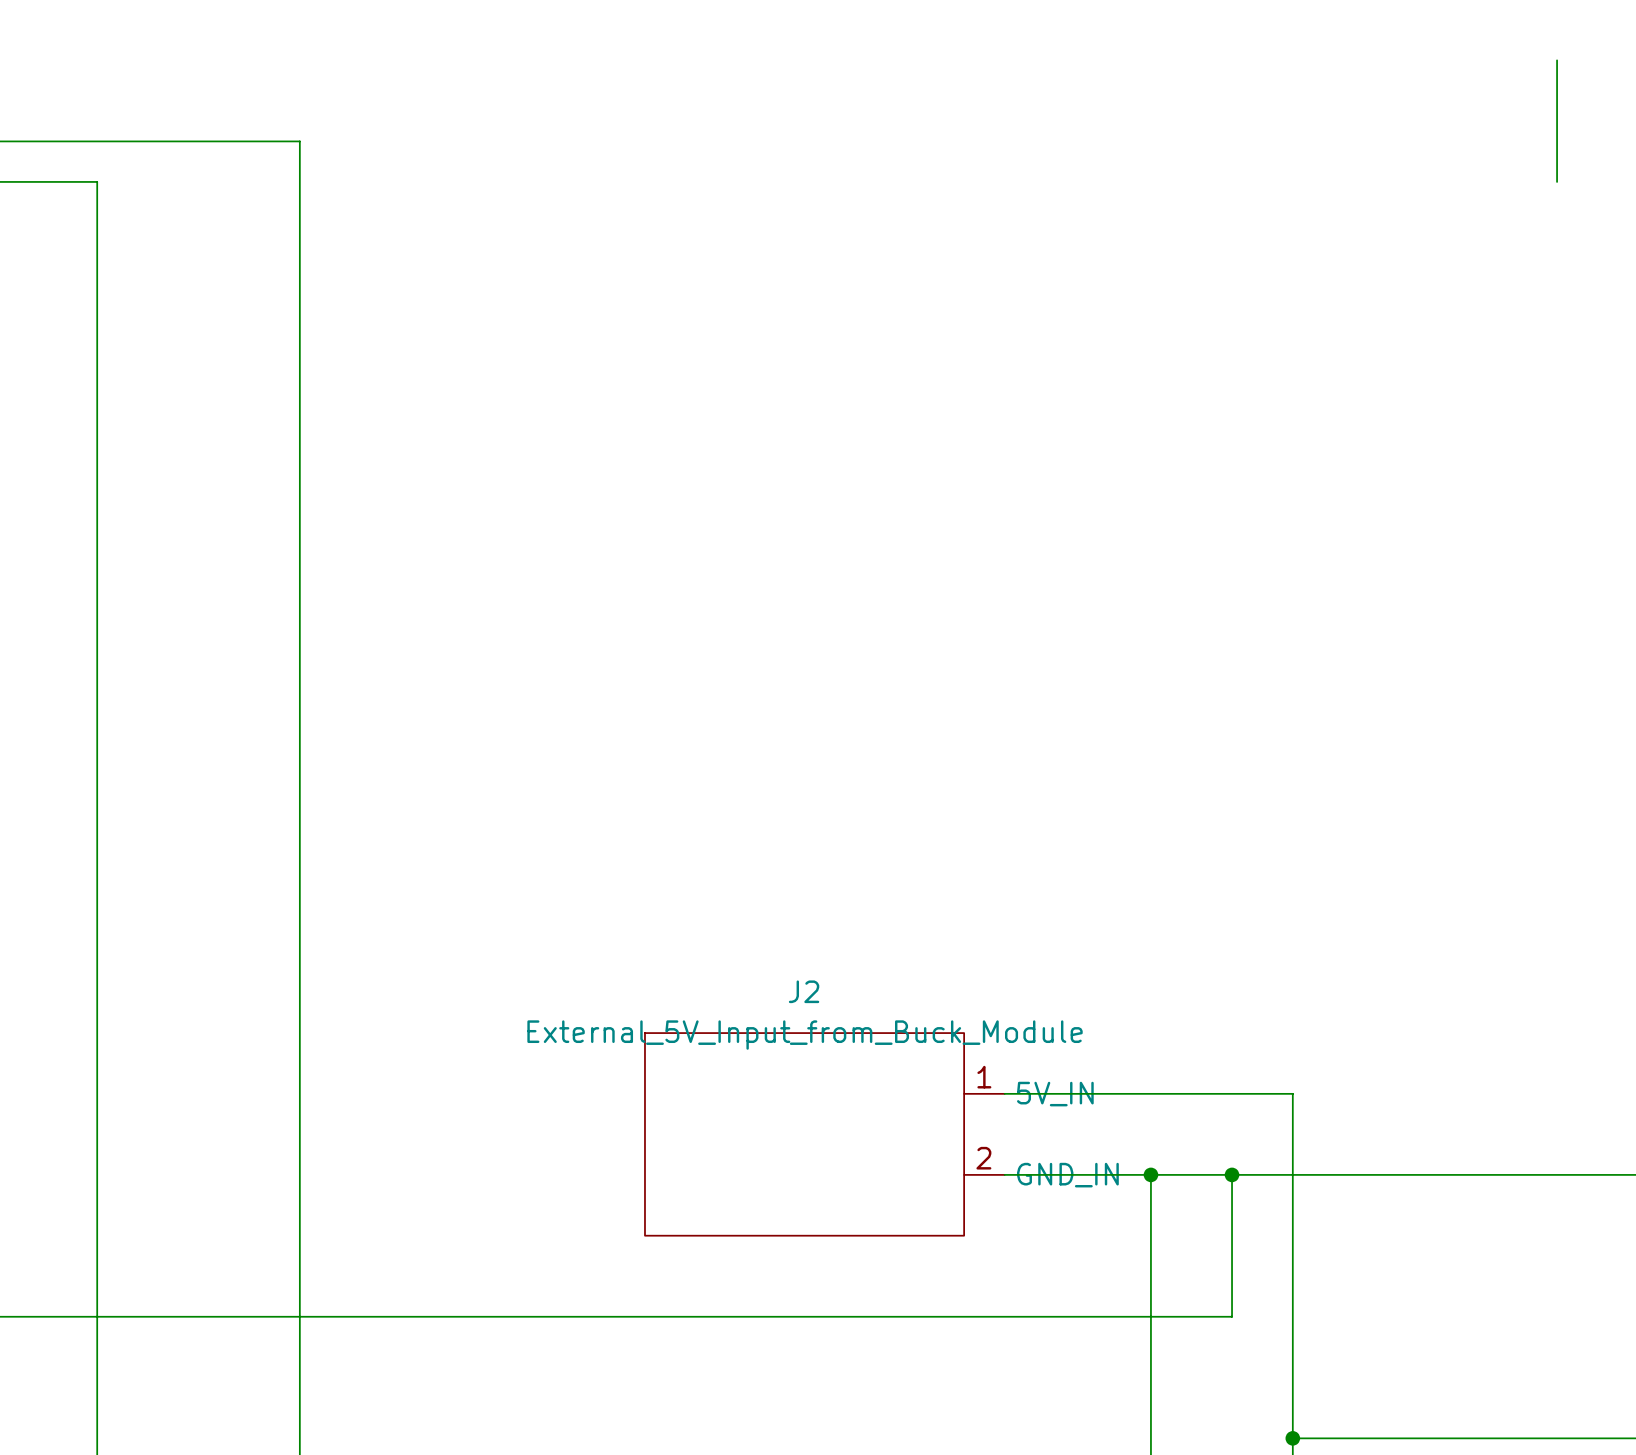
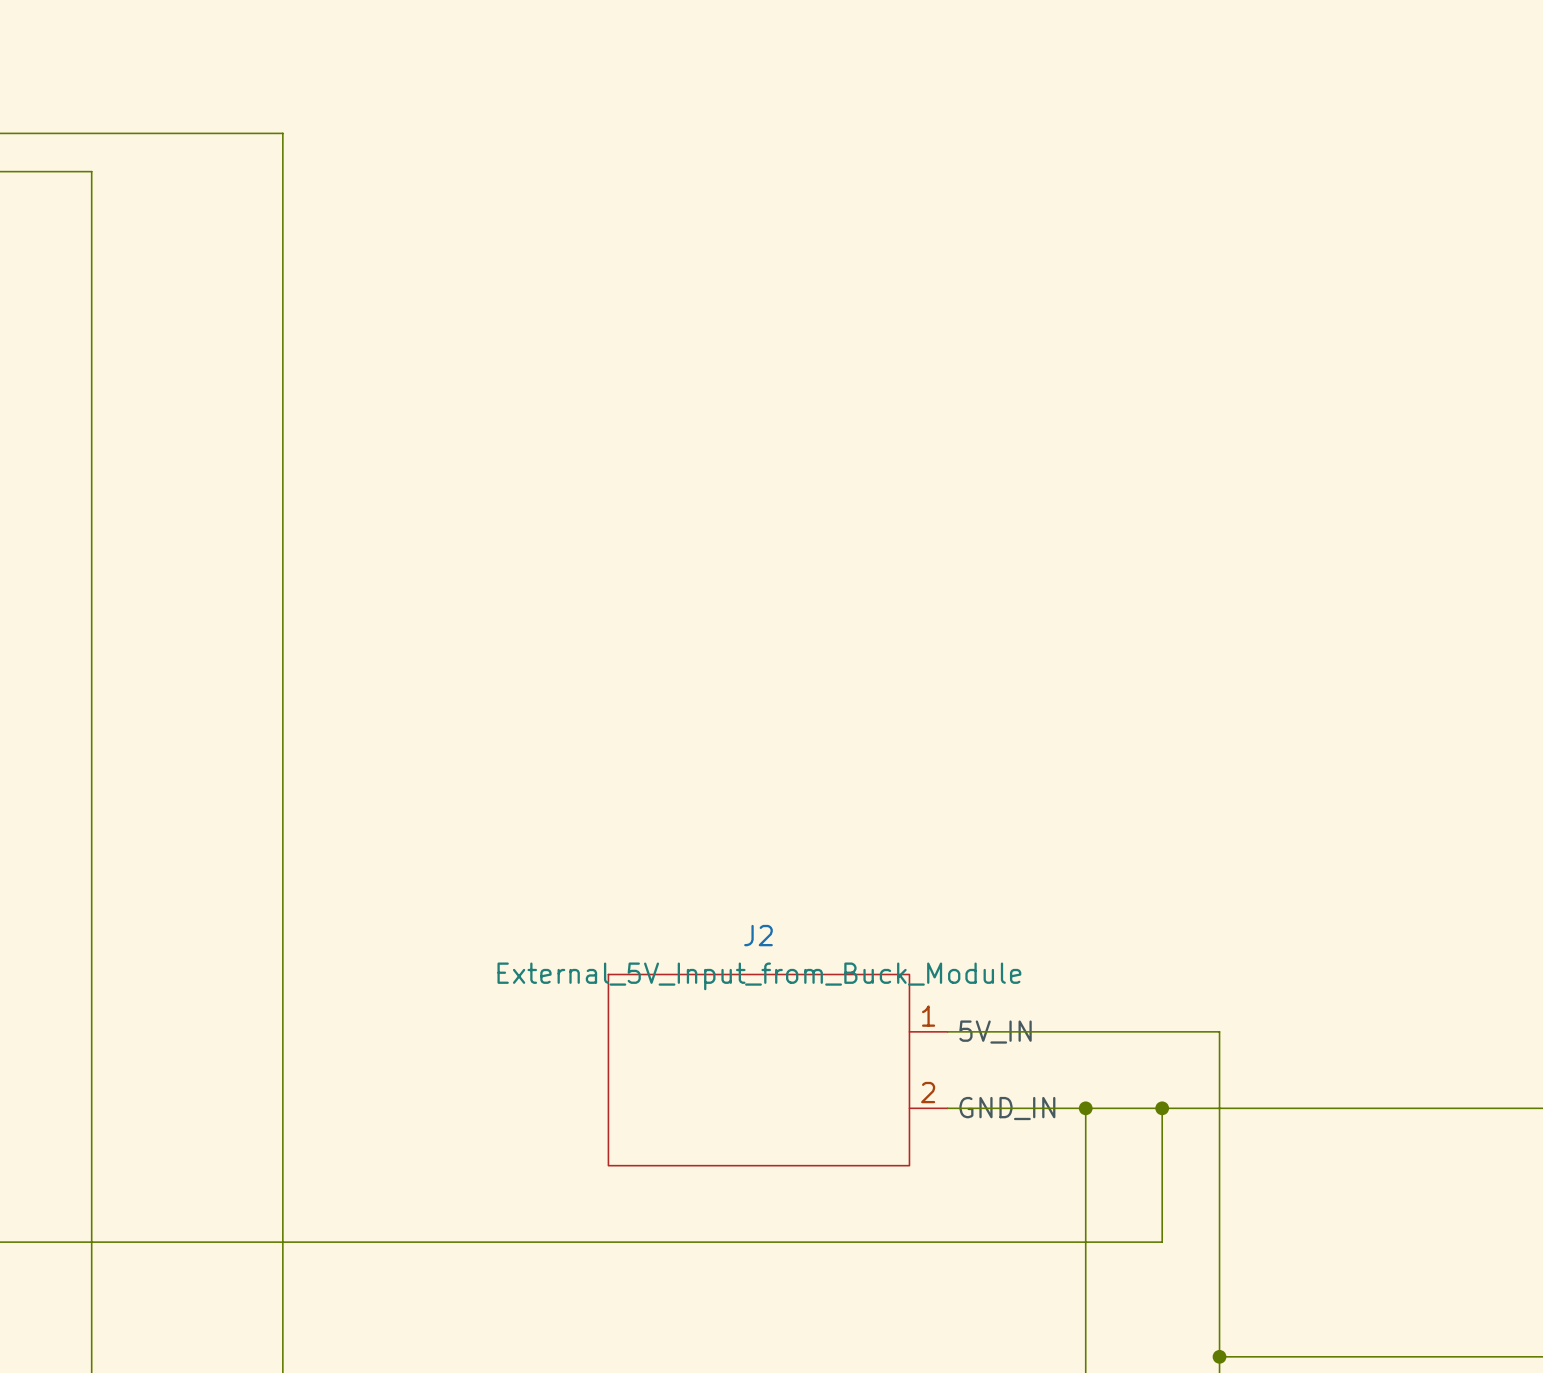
wire: (1557, 60) (1557, 181) -> none

